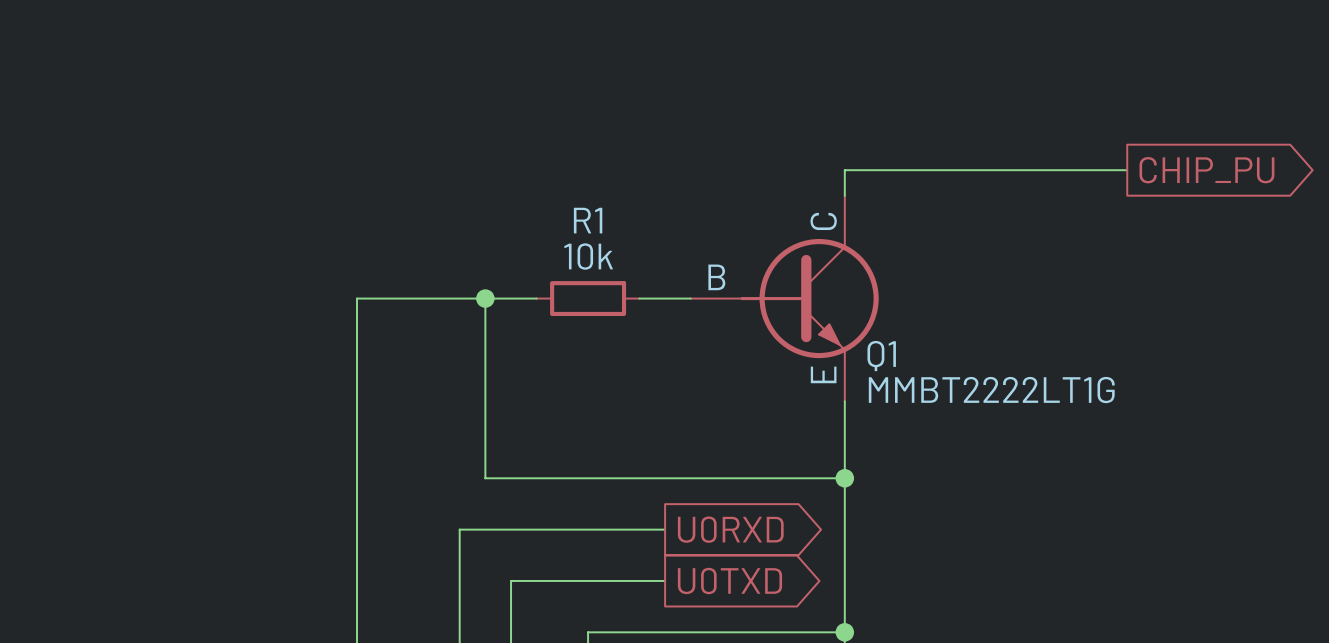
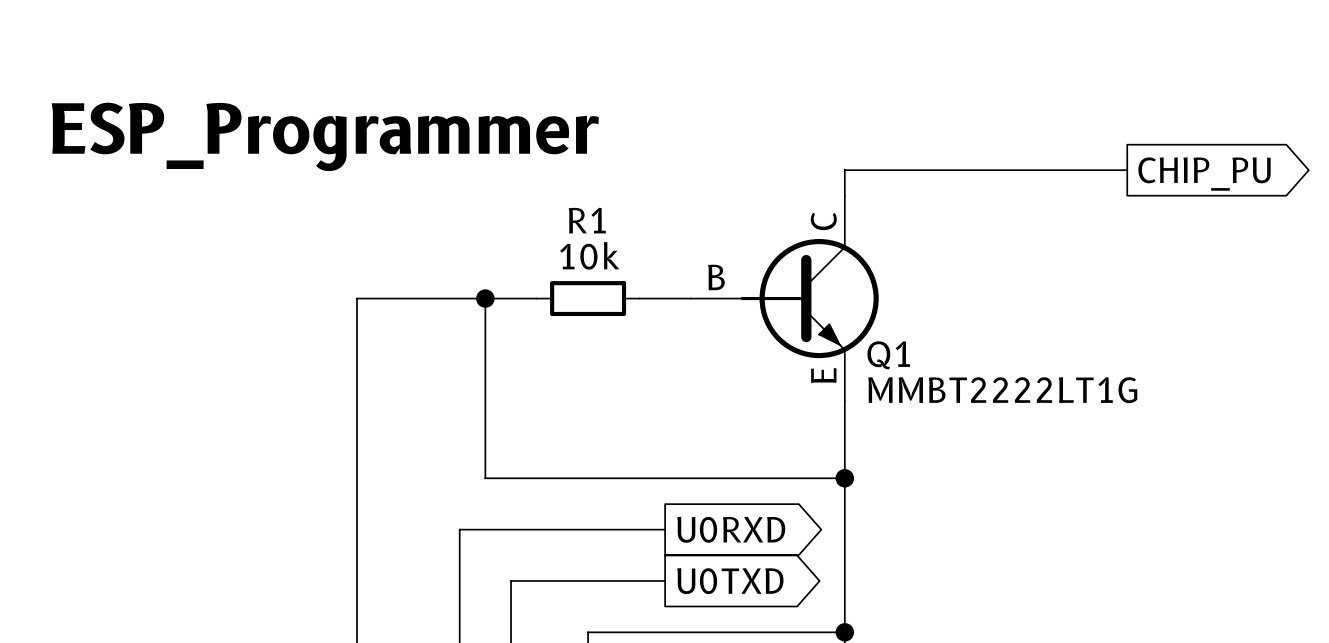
text: none -> ESP_Programmer (325, 136)

